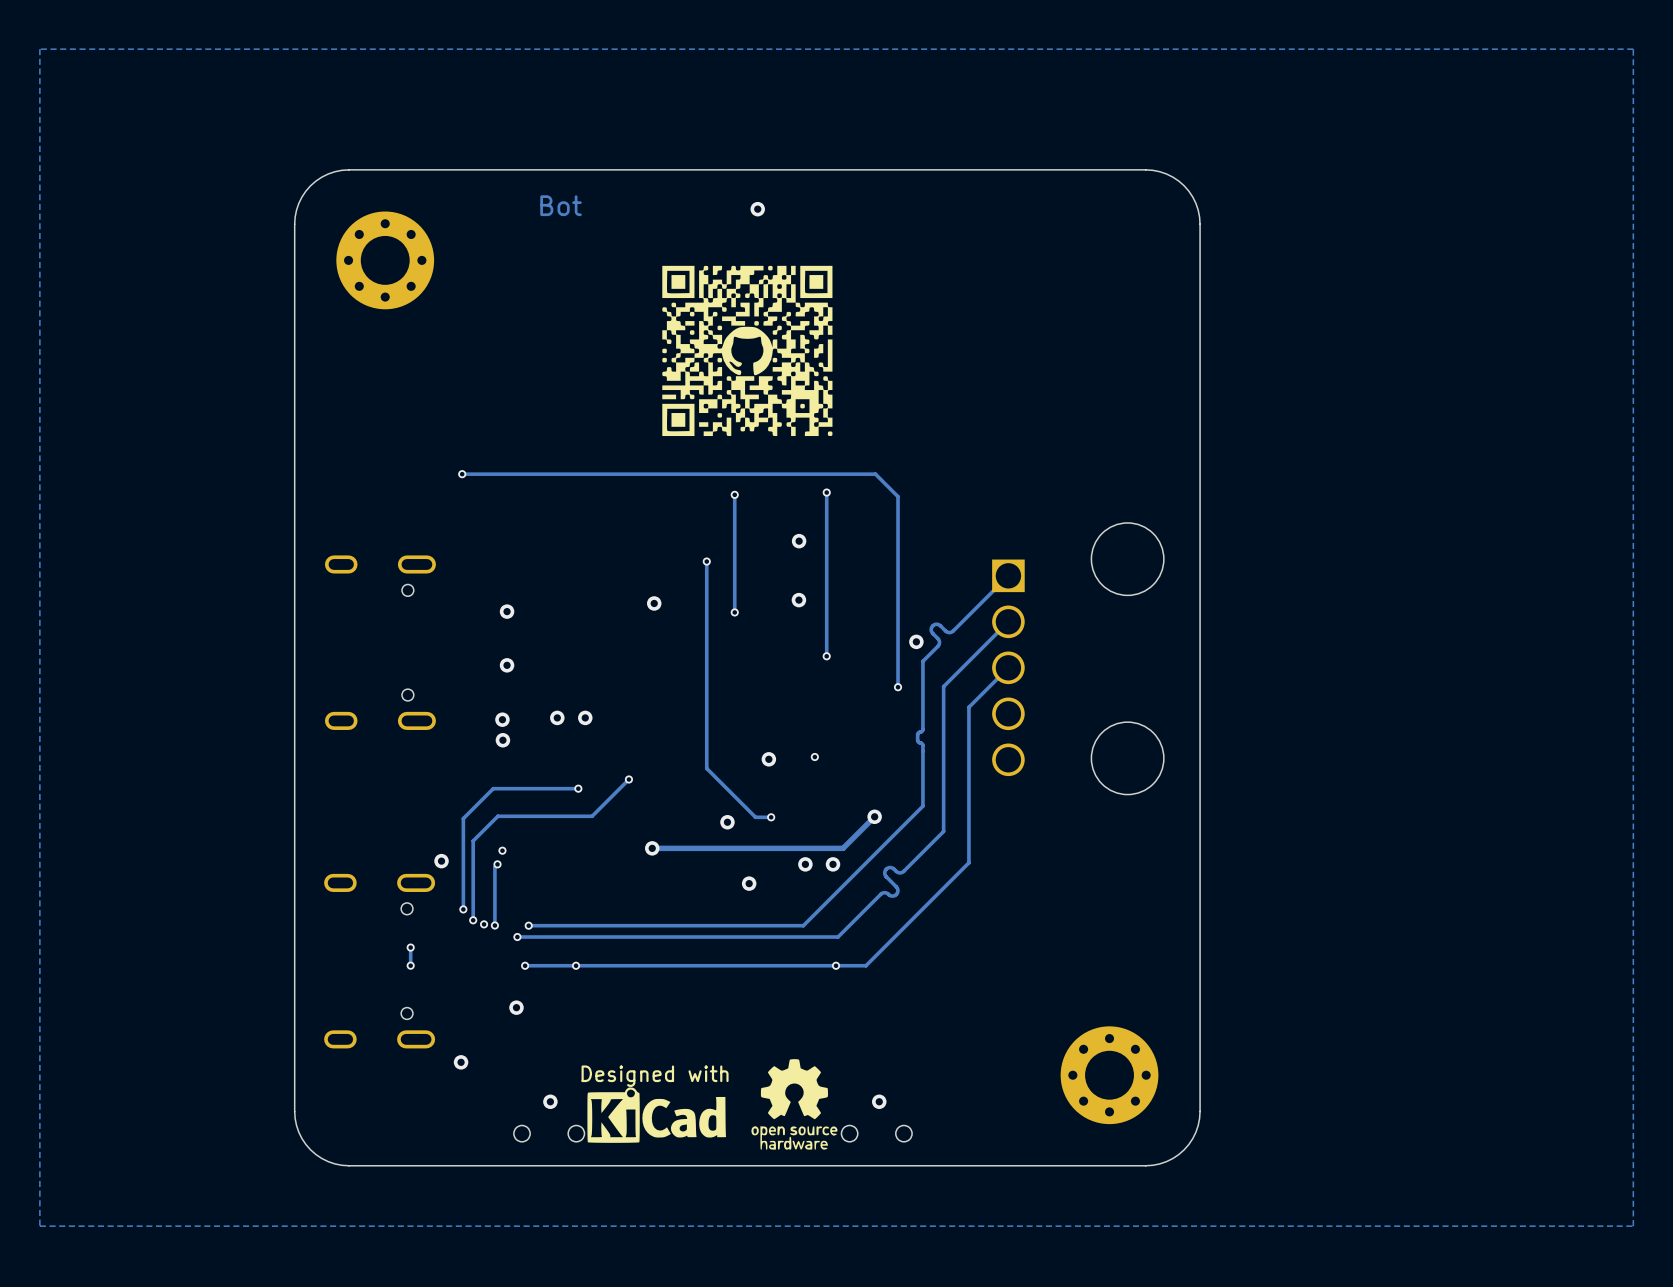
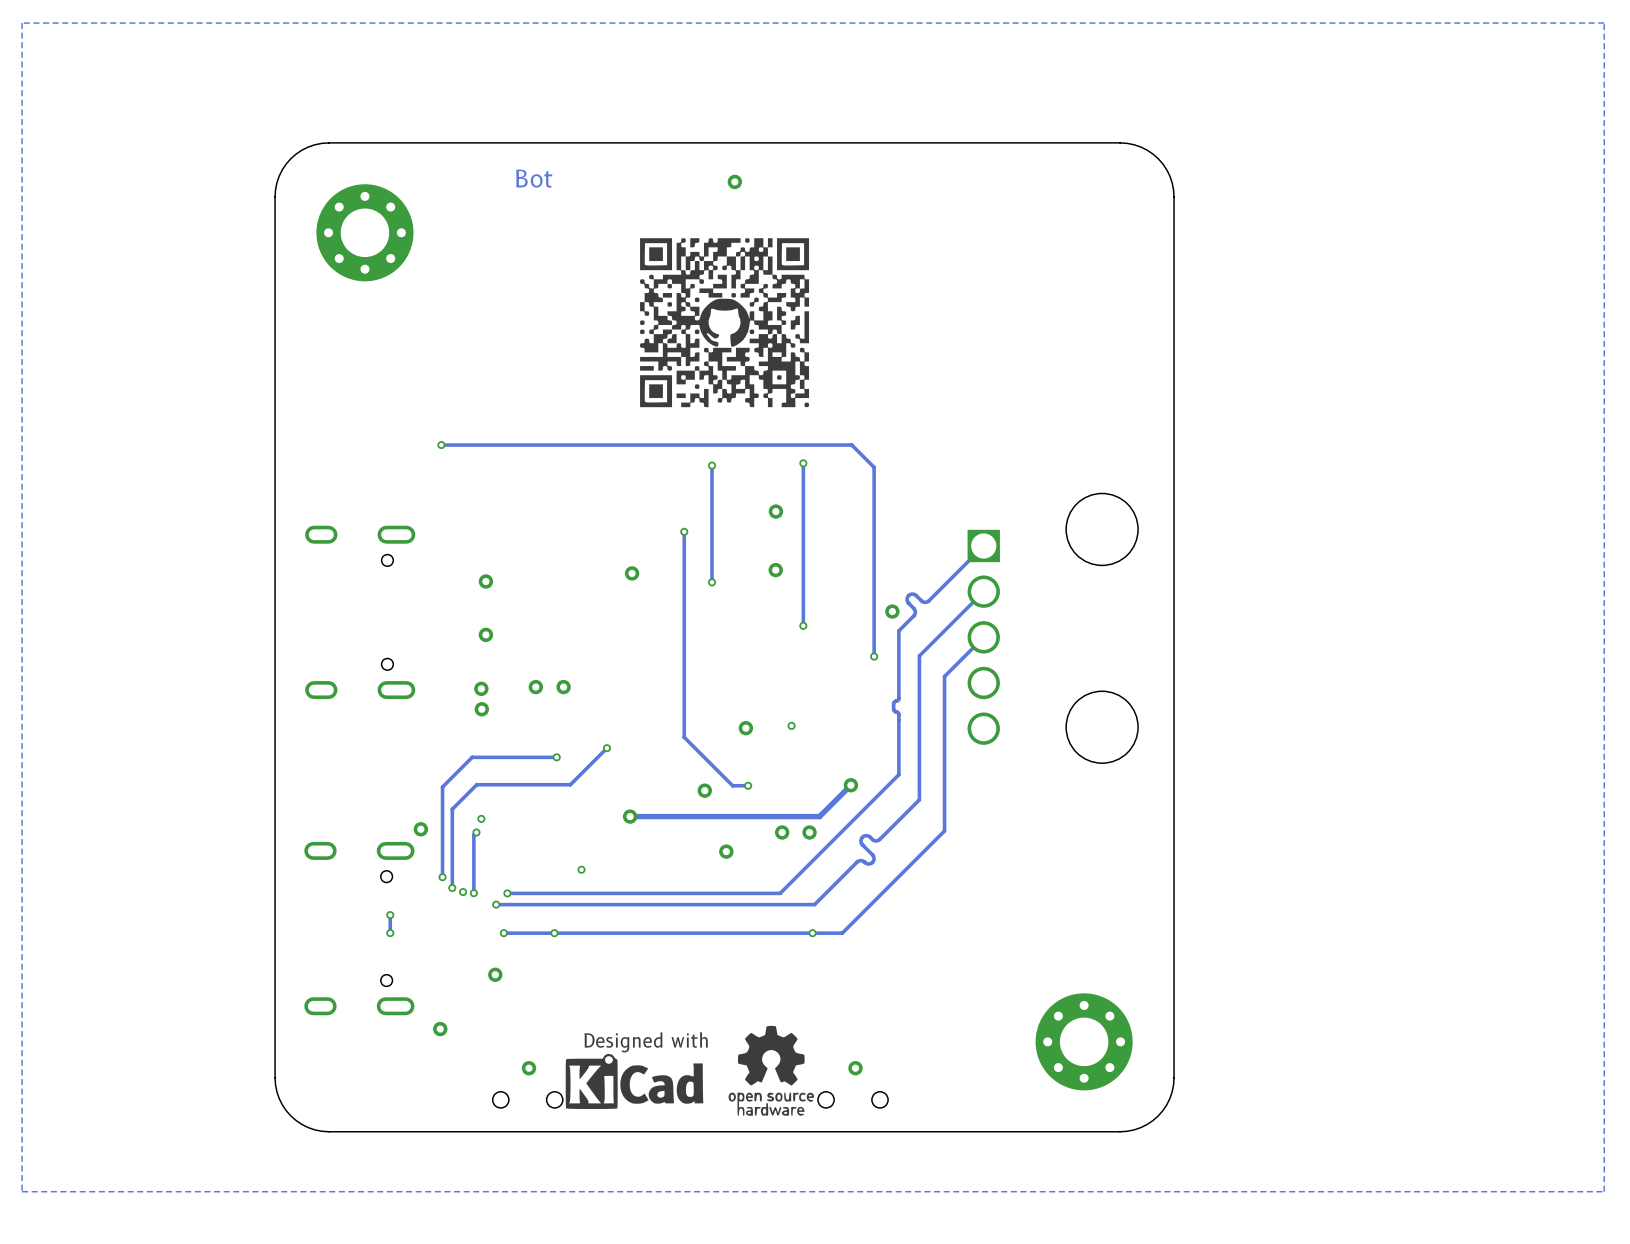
via: none -> (581, 869)

